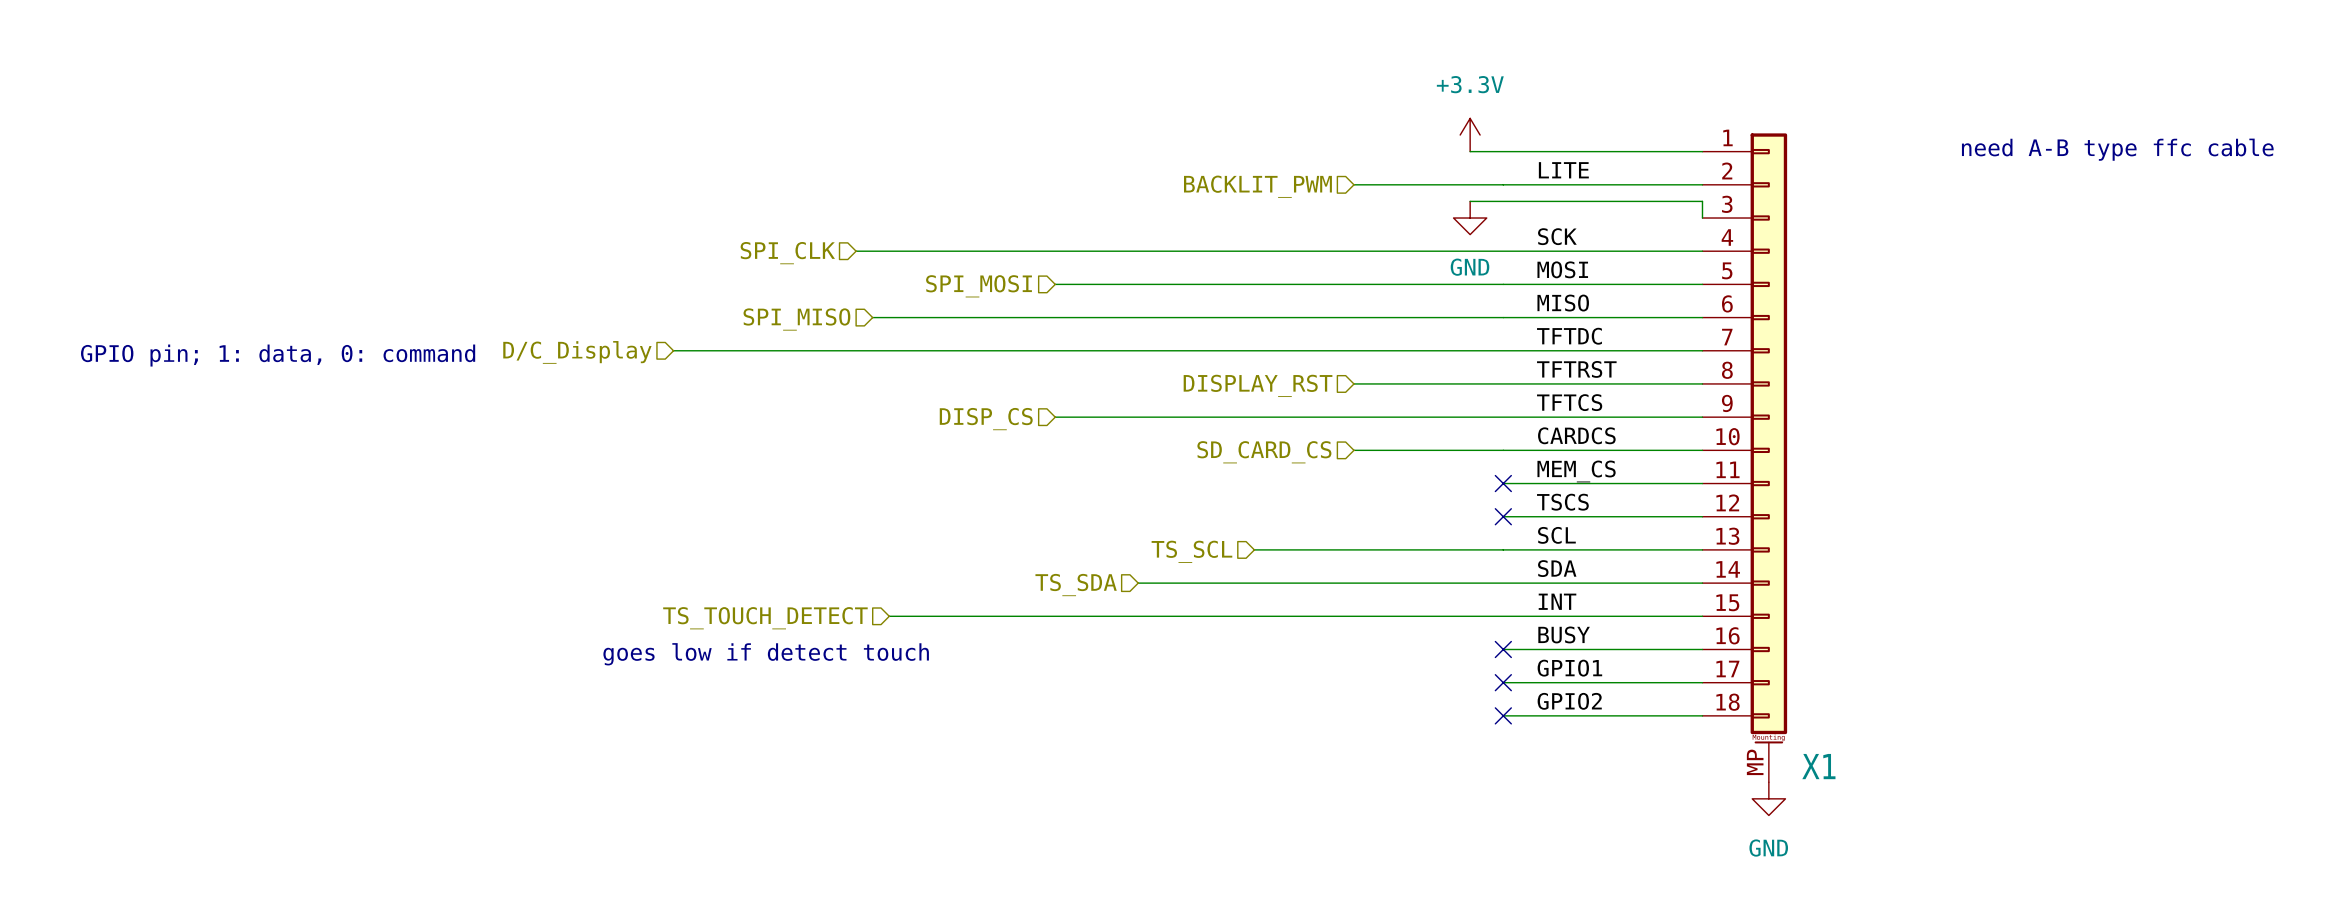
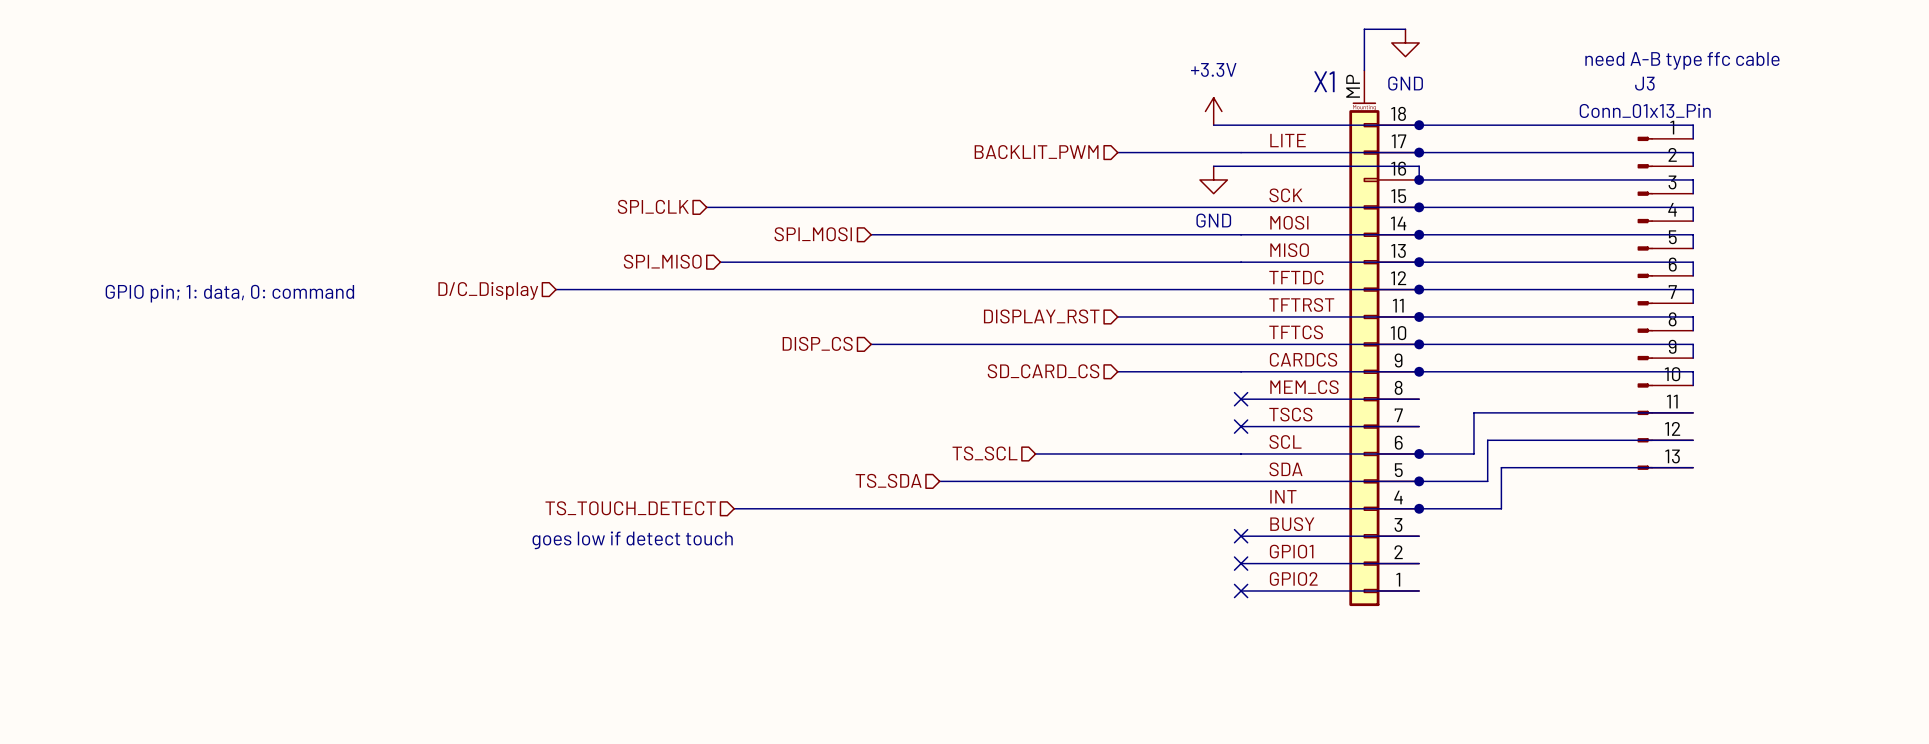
wire: none -> (1405, 29) (1364, 29) (1364, 70)
power symbol: none -> GND (1405, 42)
text position: need A-B type ffc cable (2117, 149) -> need A-B type ffc cable (1682, 60)
wire: none -> (1405, 125) (1693, 125) (1693, 138)
junction: none -> (1419, 125)
wire: none -> (1405, 152) (1693, 152) (1693, 166)
junction: none -> (1419, 152)
wire: (1702, 201) (1702, 218) -> (1405, 166) (1419, 166) (1419, 179) (1693, 179) (1693, 193)
junction: none -> (1419, 179)
wire: none -> (1405, 207) (1693, 207) (1693, 221)
junction: none -> (1419, 207)
wire: none -> (1405, 234) (1693, 234) (1693, 248)
junction: none -> (1419, 234)
wire: none -> (1405, 262) (1693, 262) (1693, 275)
junction: none -> (1419, 262)
wire: none -> (1405, 289) (1693, 289) (1693, 303)
junction: none -> (1419, 289)
J3: none -> Conn_01x13_Pin (1665, 303)
wire: none -> (1405, 316) (1693, 316) (1693, 330)
junction: none -> (1419, 316)
wire: none -> (1405, 344) (1693, 344) (1693, 358)
junction: none -> (1419, 344)
X1 rotation: 0° (1768, 438) -> 180° (1364, 354)
wire: none -> (1405, 371) (1693, 371) (1693, 385)
junction: none -> (1419, 371)
wire: none -> (1693, 412) (1473, 412) (1473, 453) (1405, 453)
wire: none -> (1693, 440) (1487, 440) (1487, 481) (1405, 481)
junction: none -> (1419, 453)
wire: none -> (1693, 467) (1501, 467) (1501, 508) (1405, 508)
junction: none -> (1419, 481)
junction: none -> (1419, 508)
power symbol: GND (1768, 798) -> none

